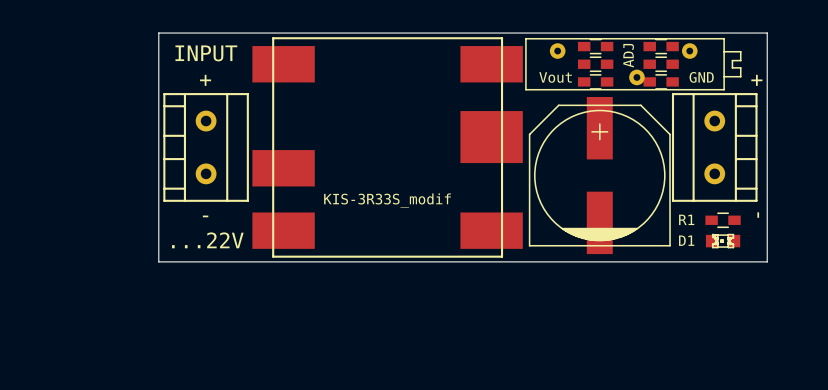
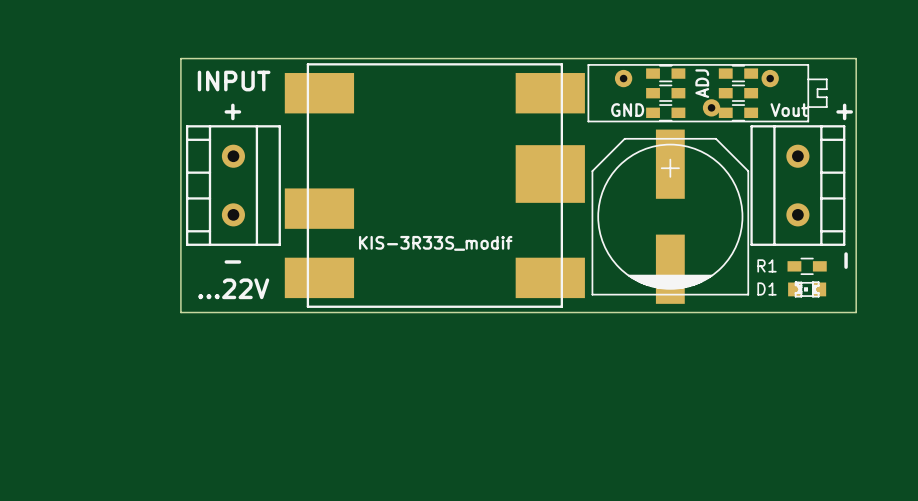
text: Vout (555, 77) -> GND (627, 110)
text: GND (701, 77) -> Vout (789, 110)

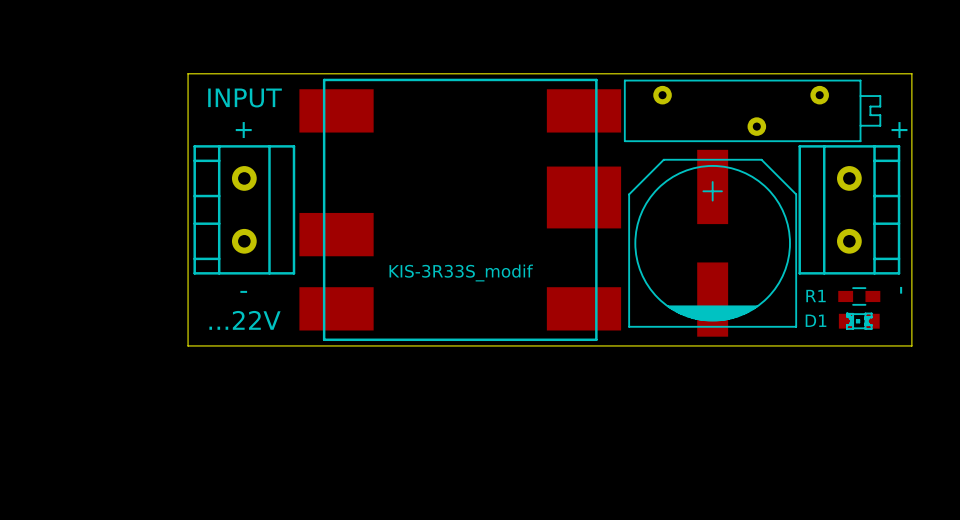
part: (665, 73) -> none
part: (738, 73) -> none
text: ADJ (702, 83) -> none
part: (665, 93) -> none
part: (738, 93) -> none
text: GND (627, 110) -> none
text: Vout (789, 110) -> none
part: (665, 112) -> none
part: (738, 112) -> none

